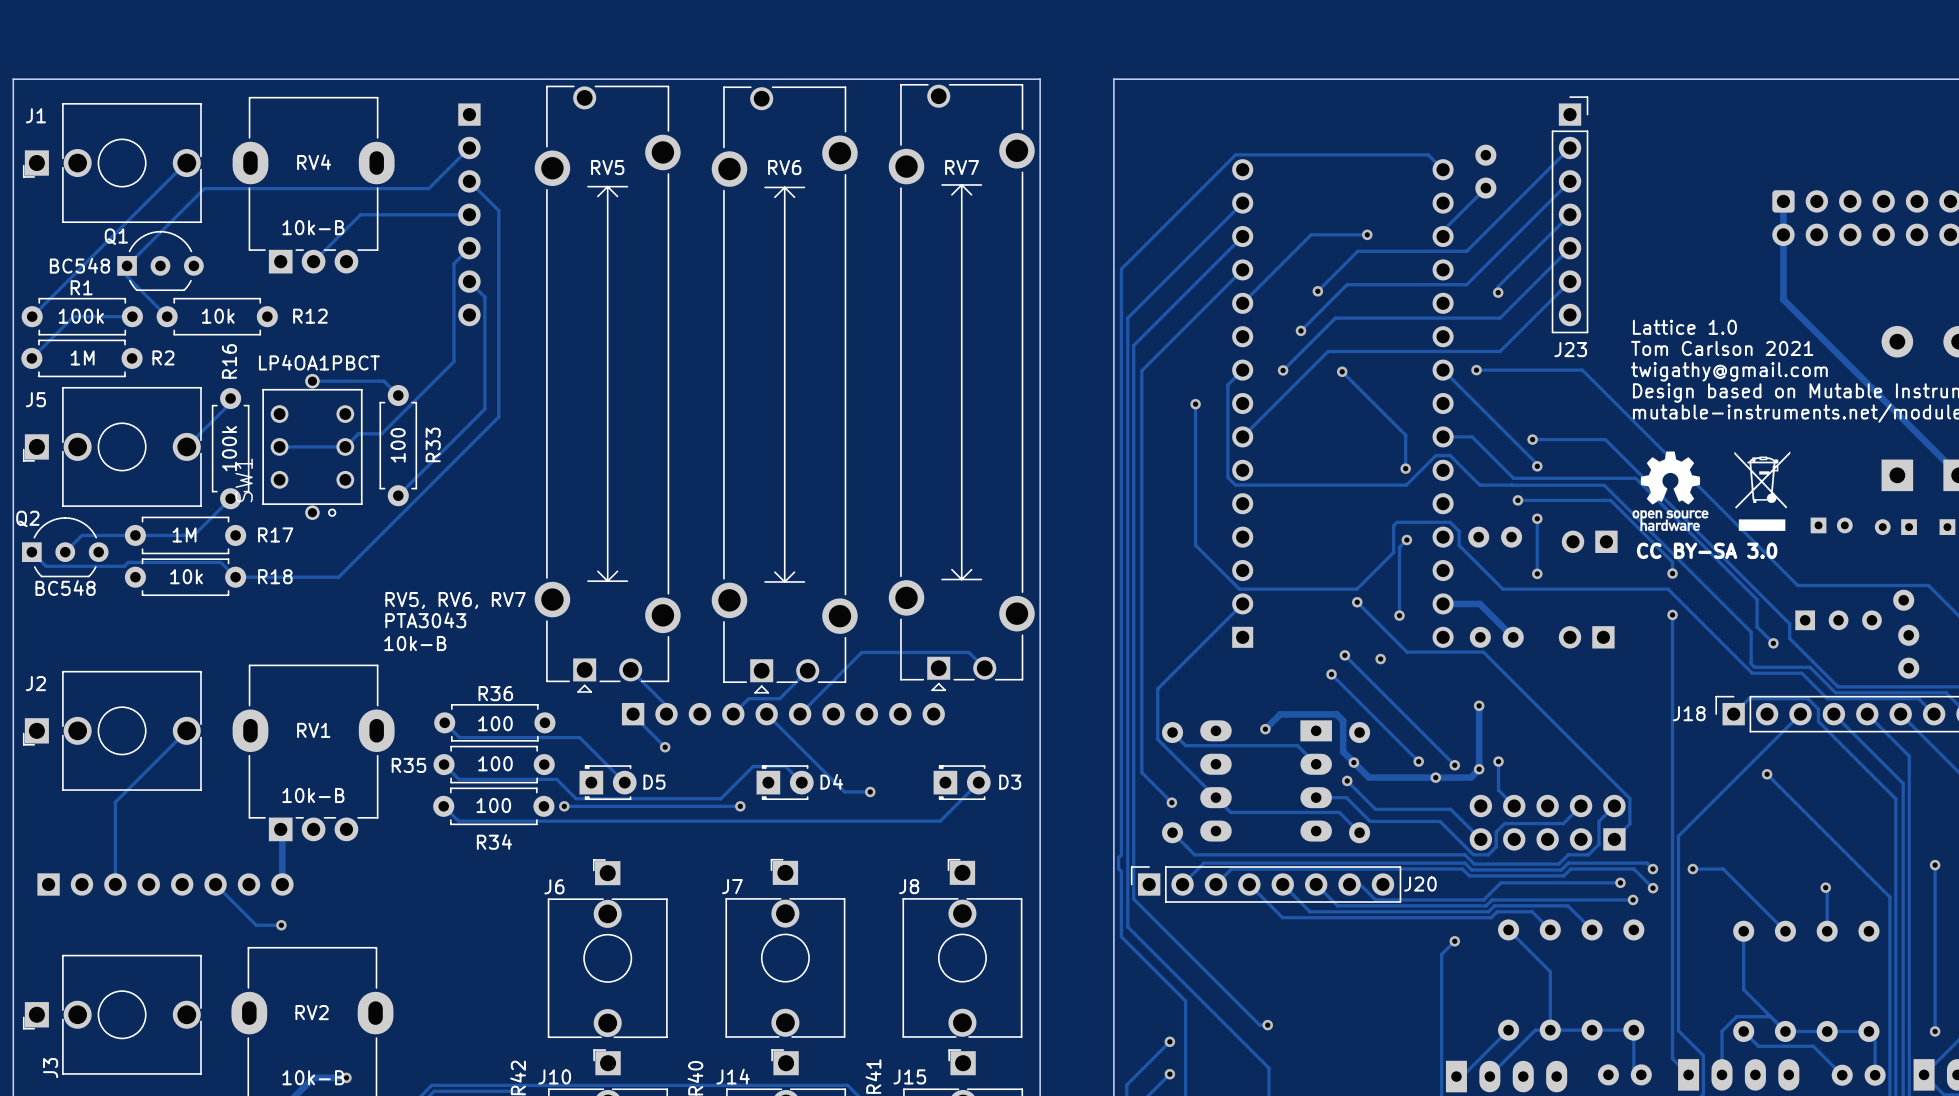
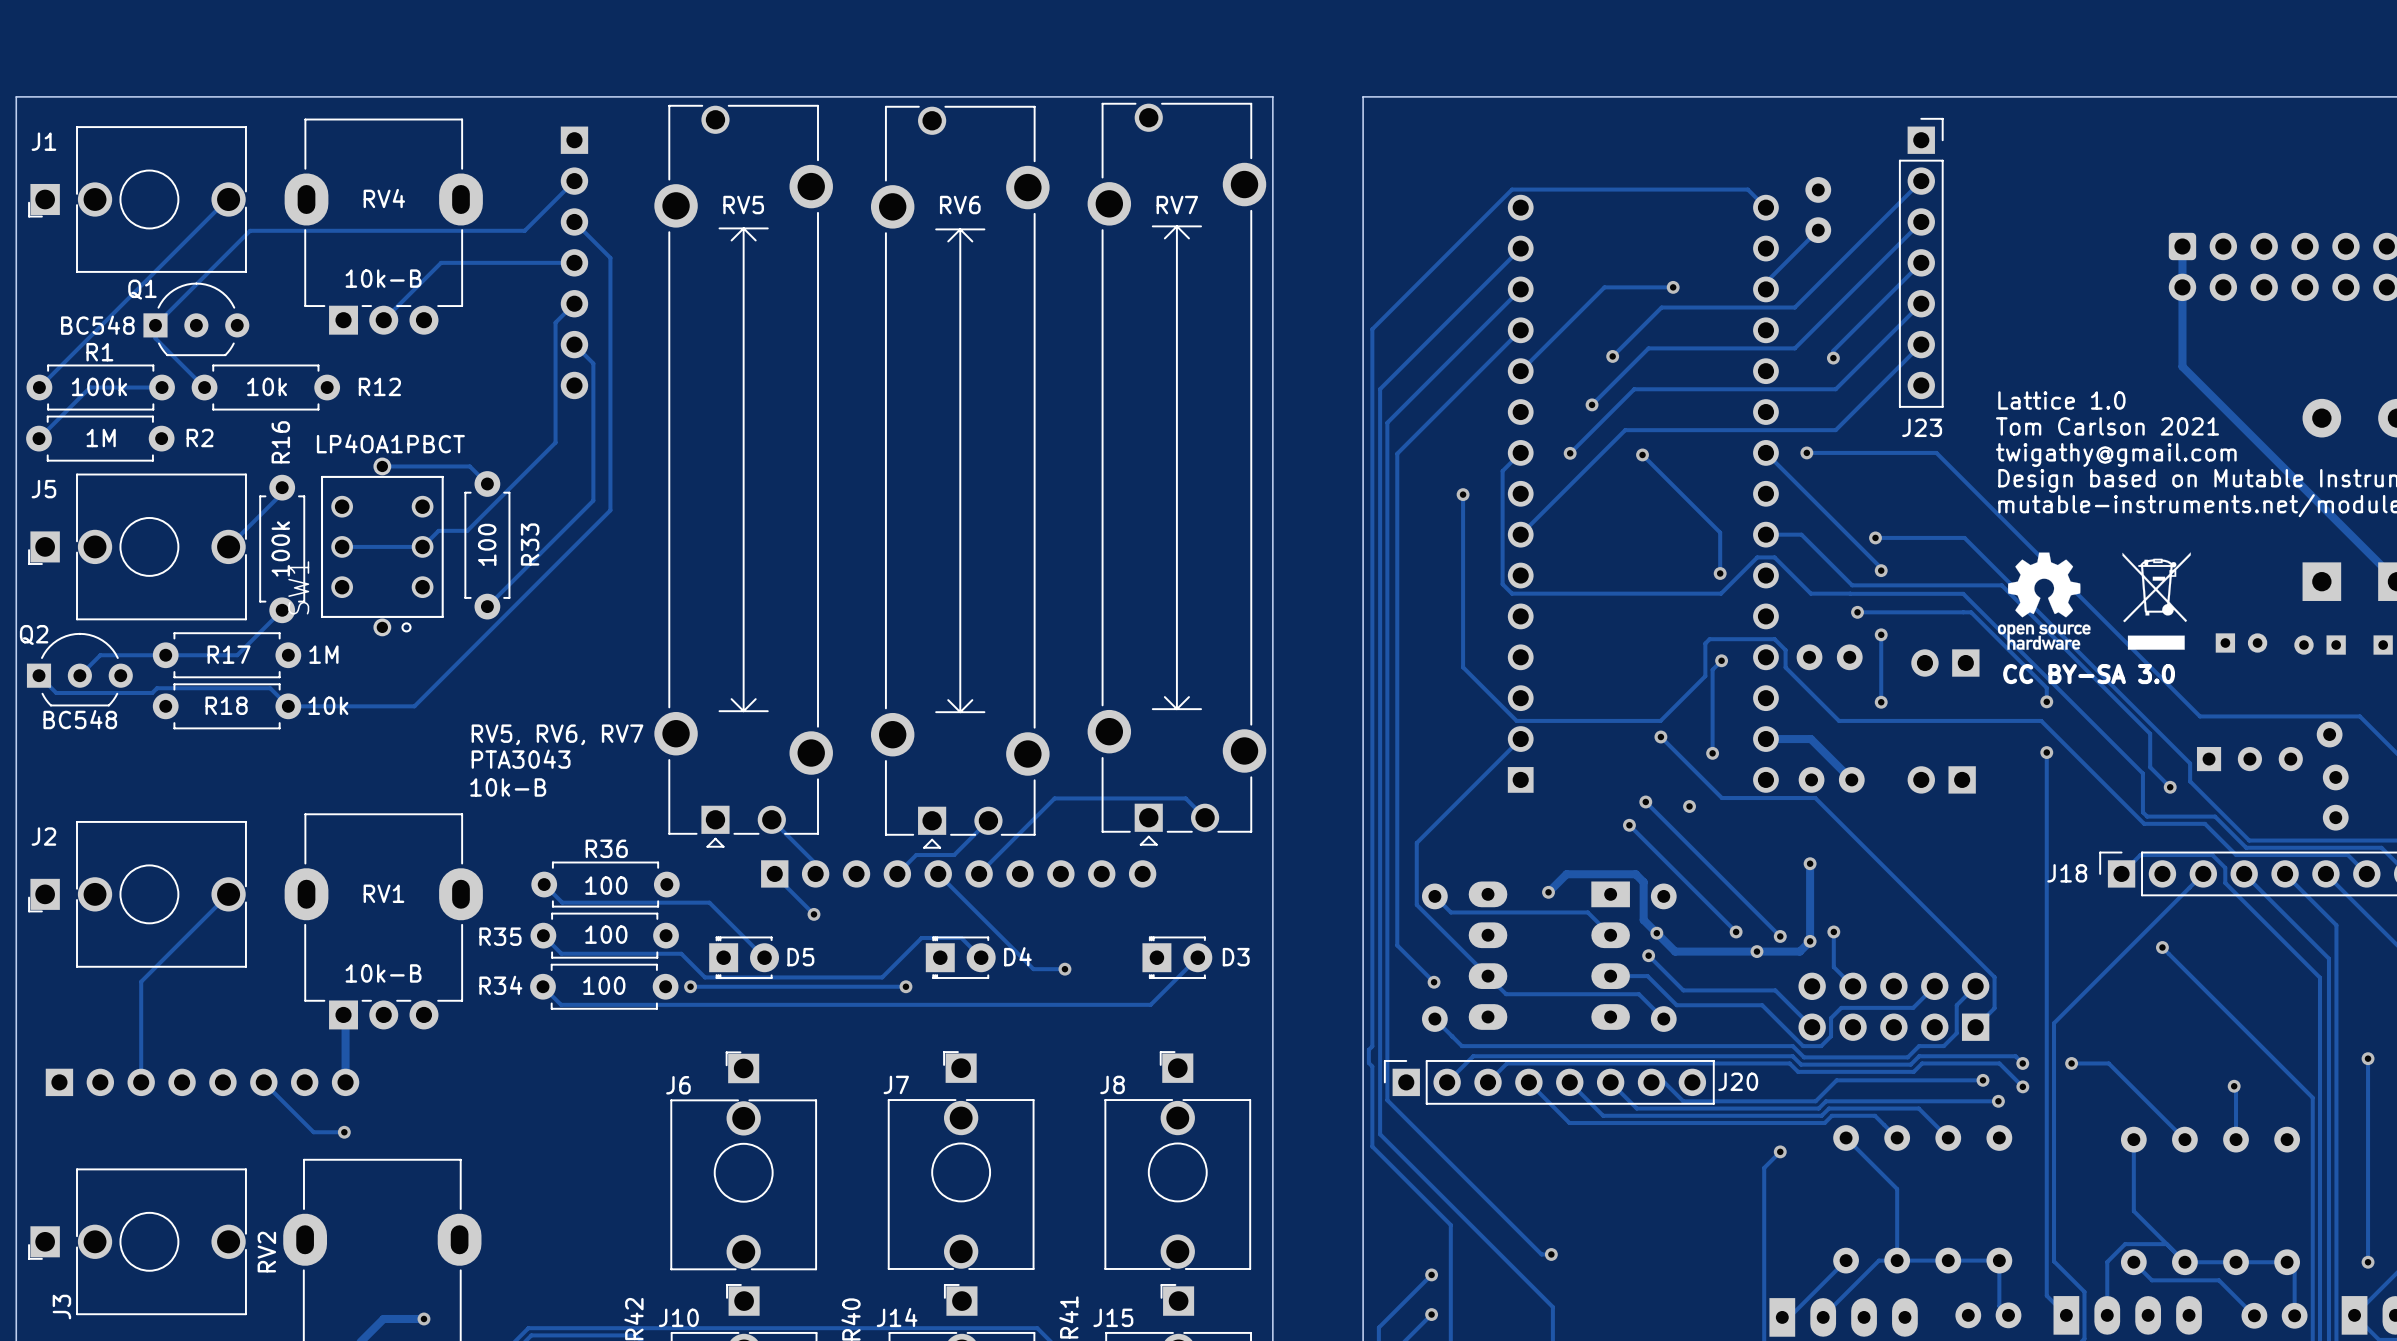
R17 value position: 1M (184, 534) -> 1M (323, 654)
R17 name position: R17 (275, 534) -> R17 (229, 654)
R18 value position: 10k (186, 576) -> 10k (328, 705)
R18 name position: R18 (275, 576) -> R18 (226, 705)
R34 name position: R34 (494, 841) -> R34 (500, 985)
RV2 name rotation: 0° (312, 1012) -> 90° counterclockwise (266, 1252)
RV2 name position: RV2 (312, 1012) -> RV2 (266, 1252)
RV2 value: 10k-B (313, 1077) -> none

